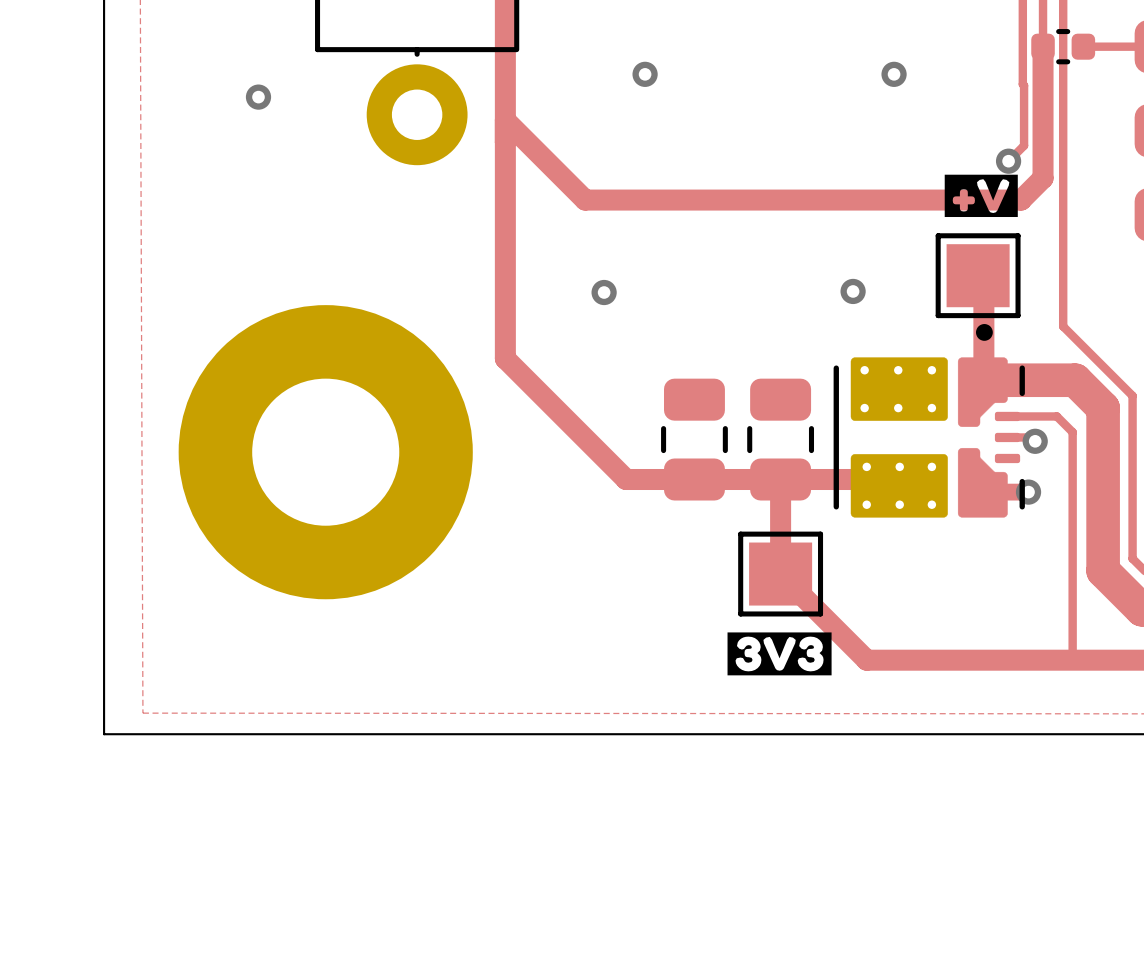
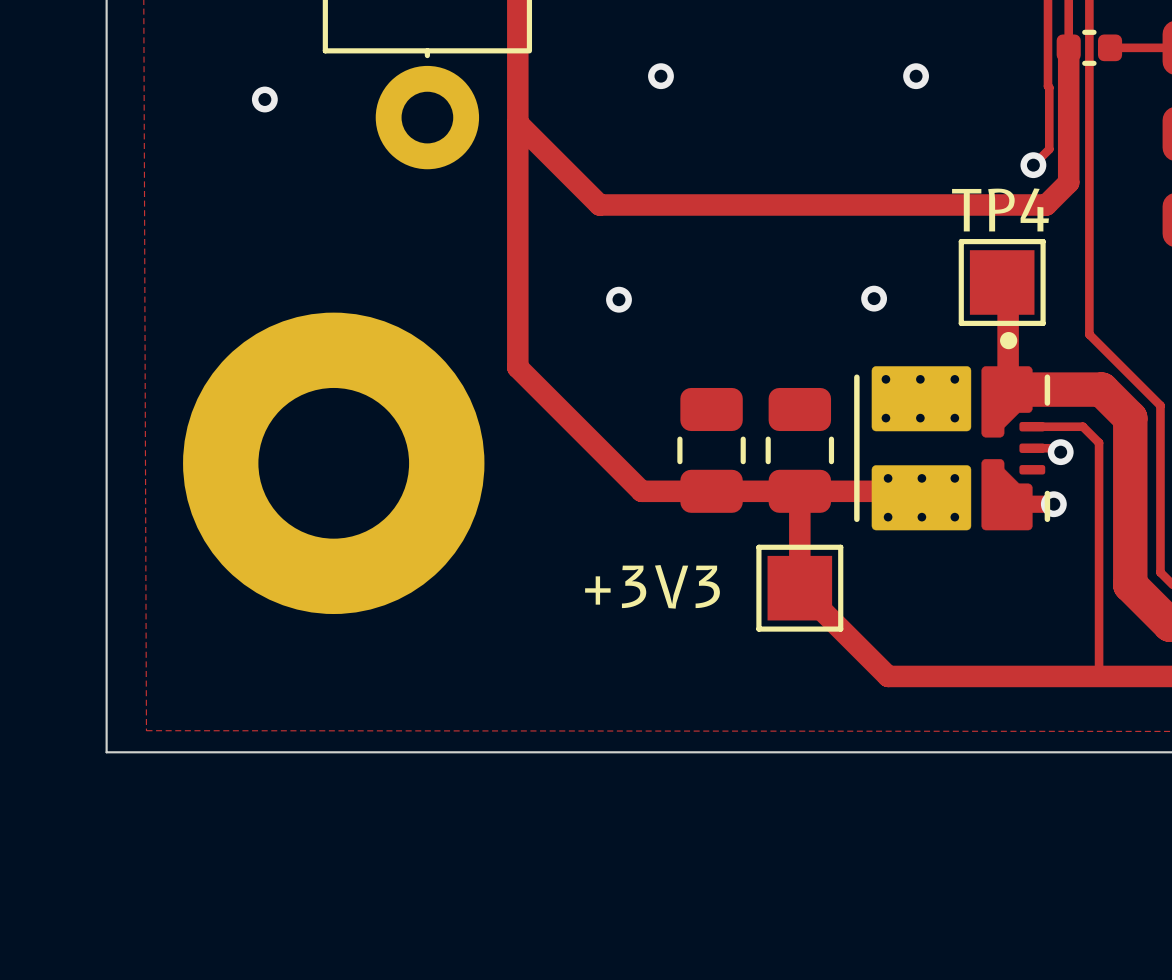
drawing: [944, 174, 1018, 218] -> none
TP4 name: none -> TP4 (1000, 209)
text: none -> +3V3 (652, 586)
drawing: [727, 632, 832, 676] -> none

